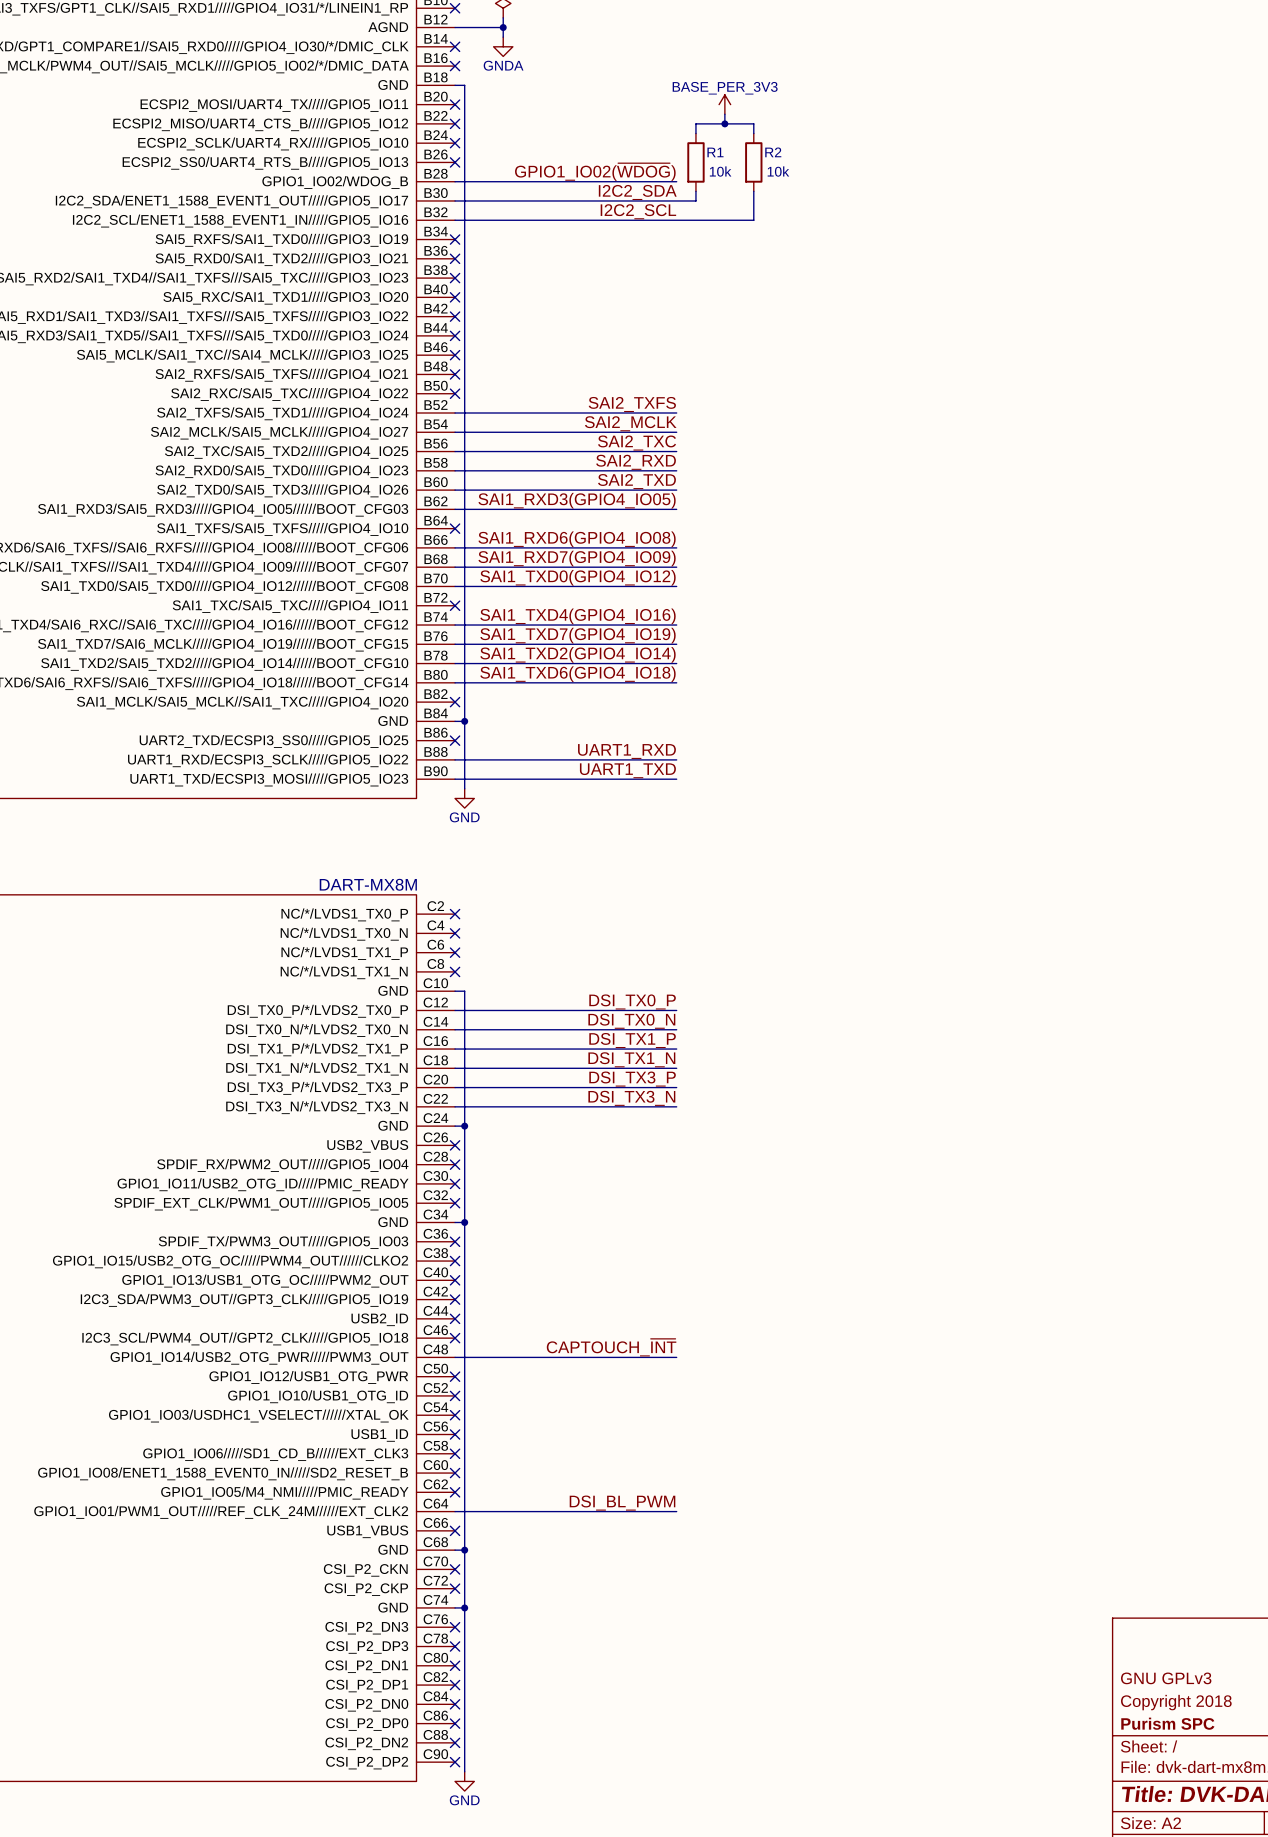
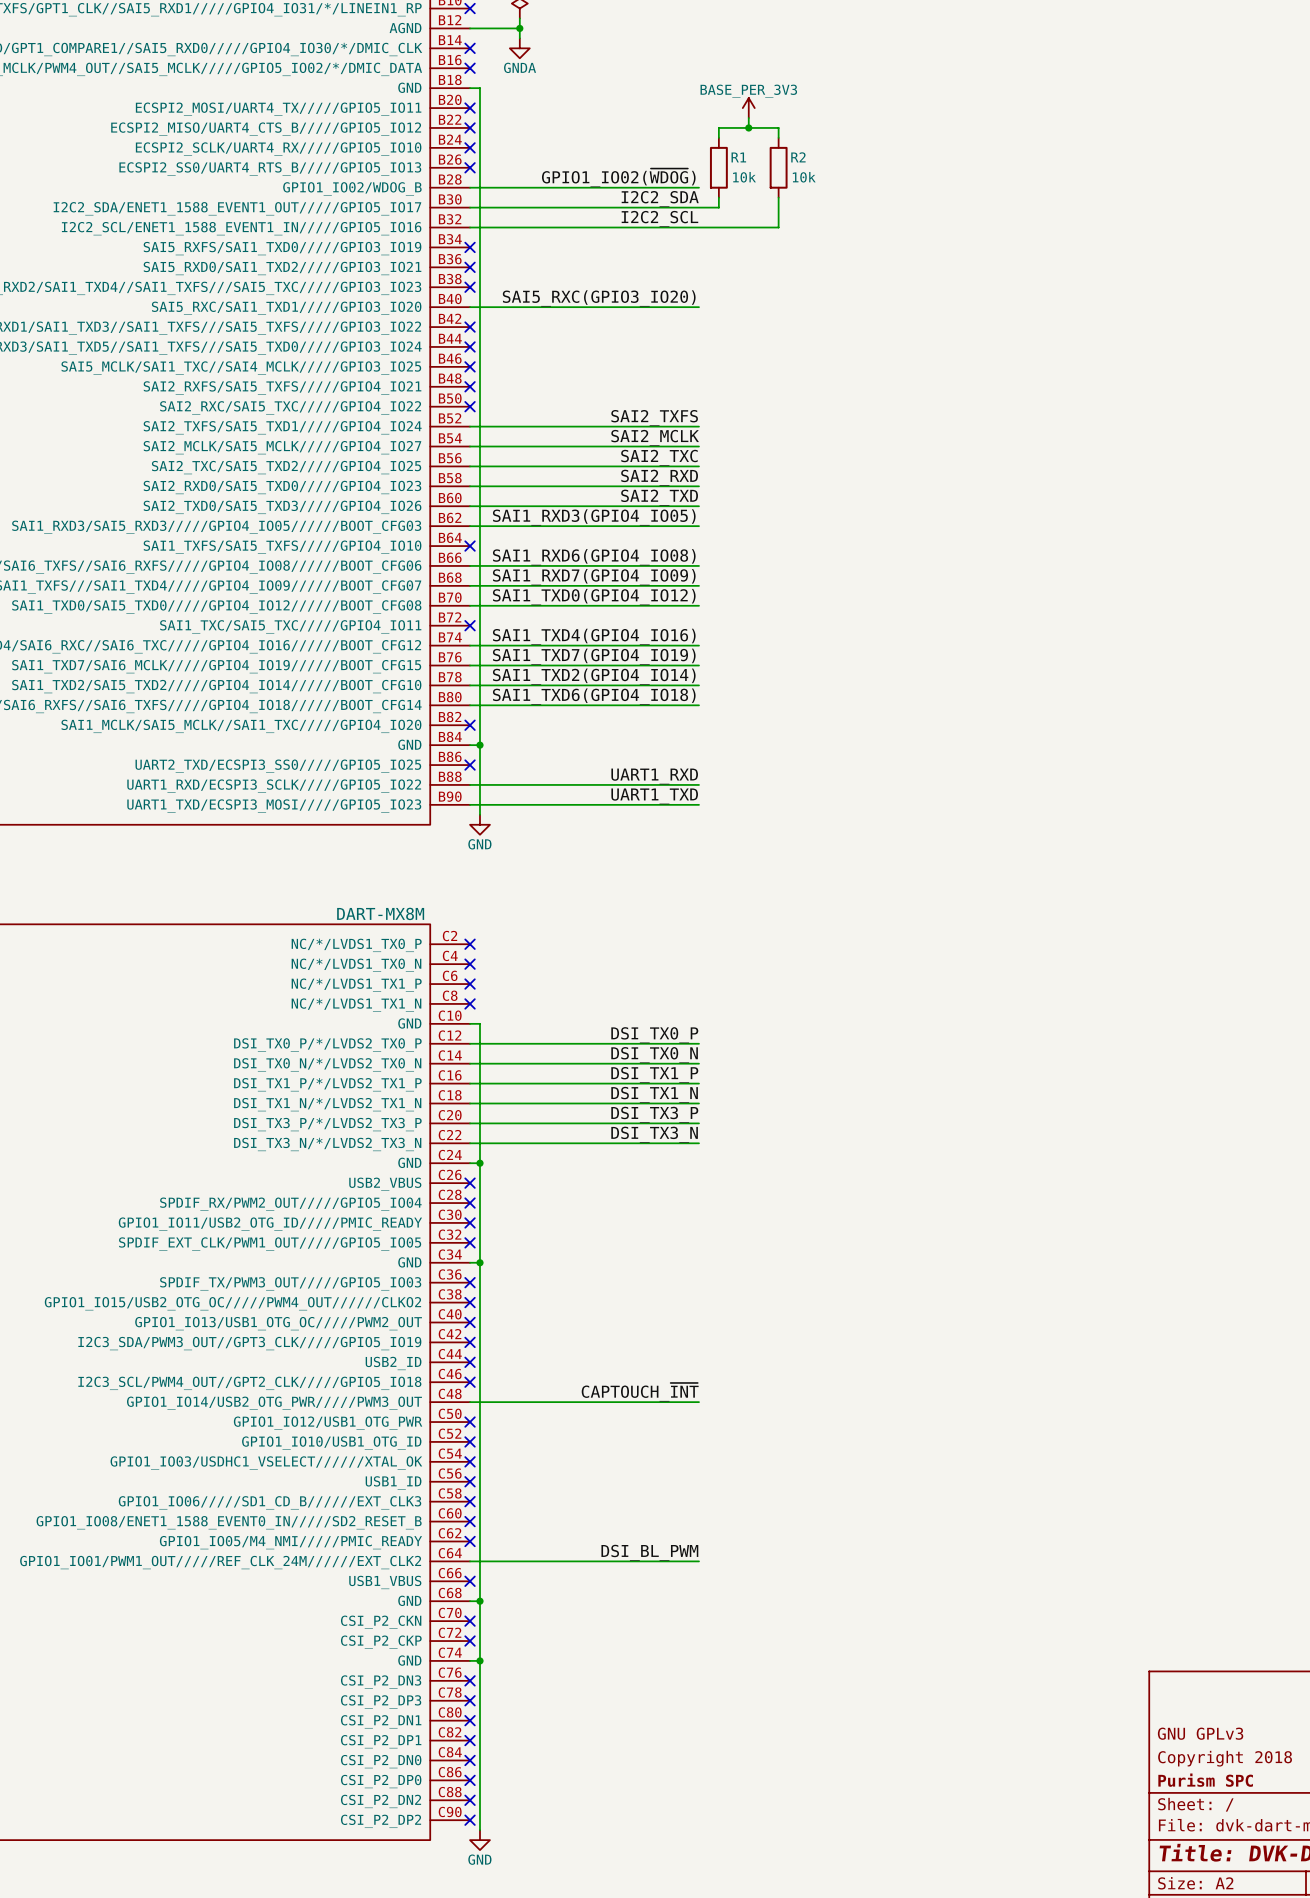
label: none -> SAI5_RXC(GPIO3_IO20) (599, 298)
wire: none -> (470, 307) (698, 307)
no-connect mark: (455, 297) -> none

